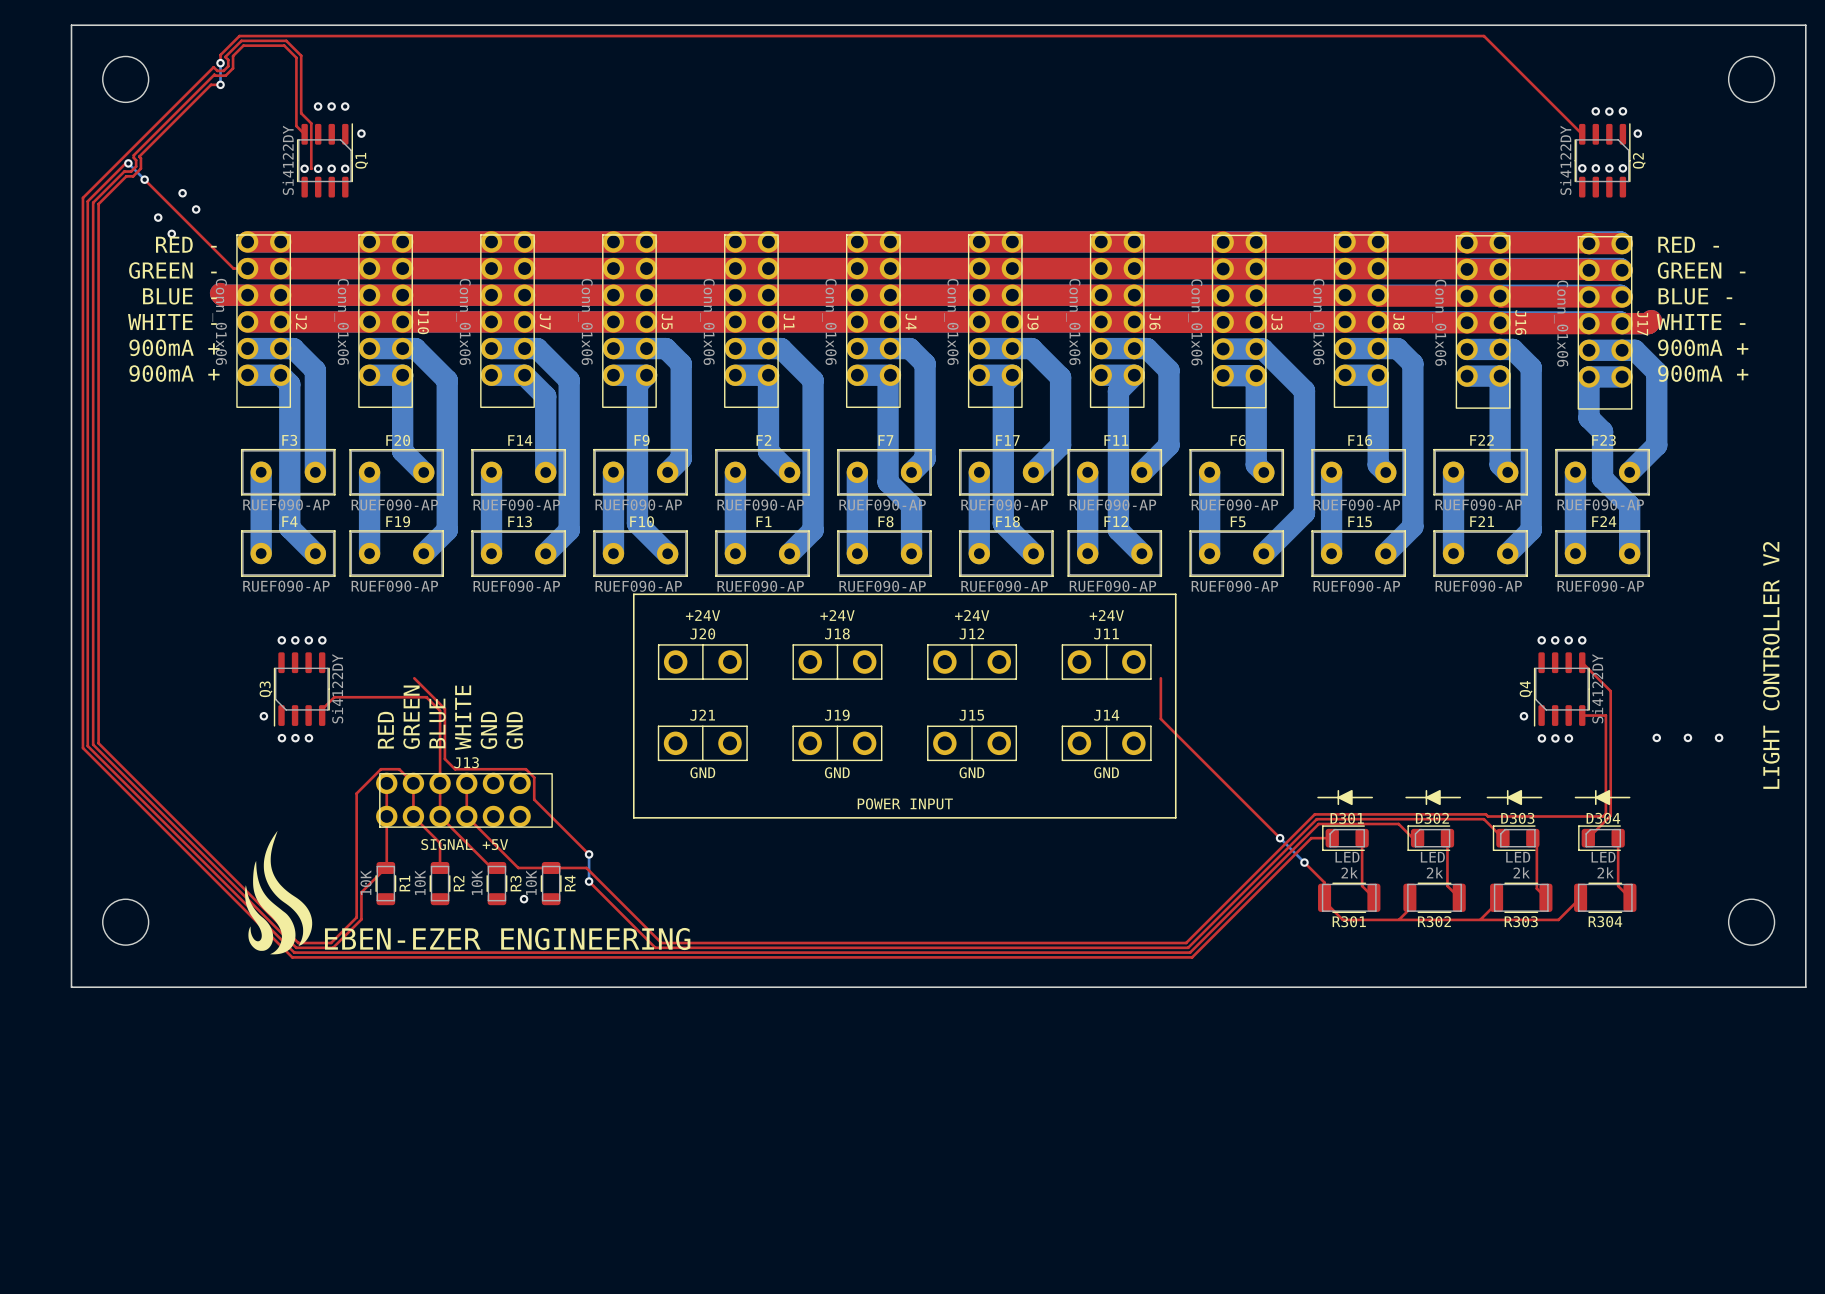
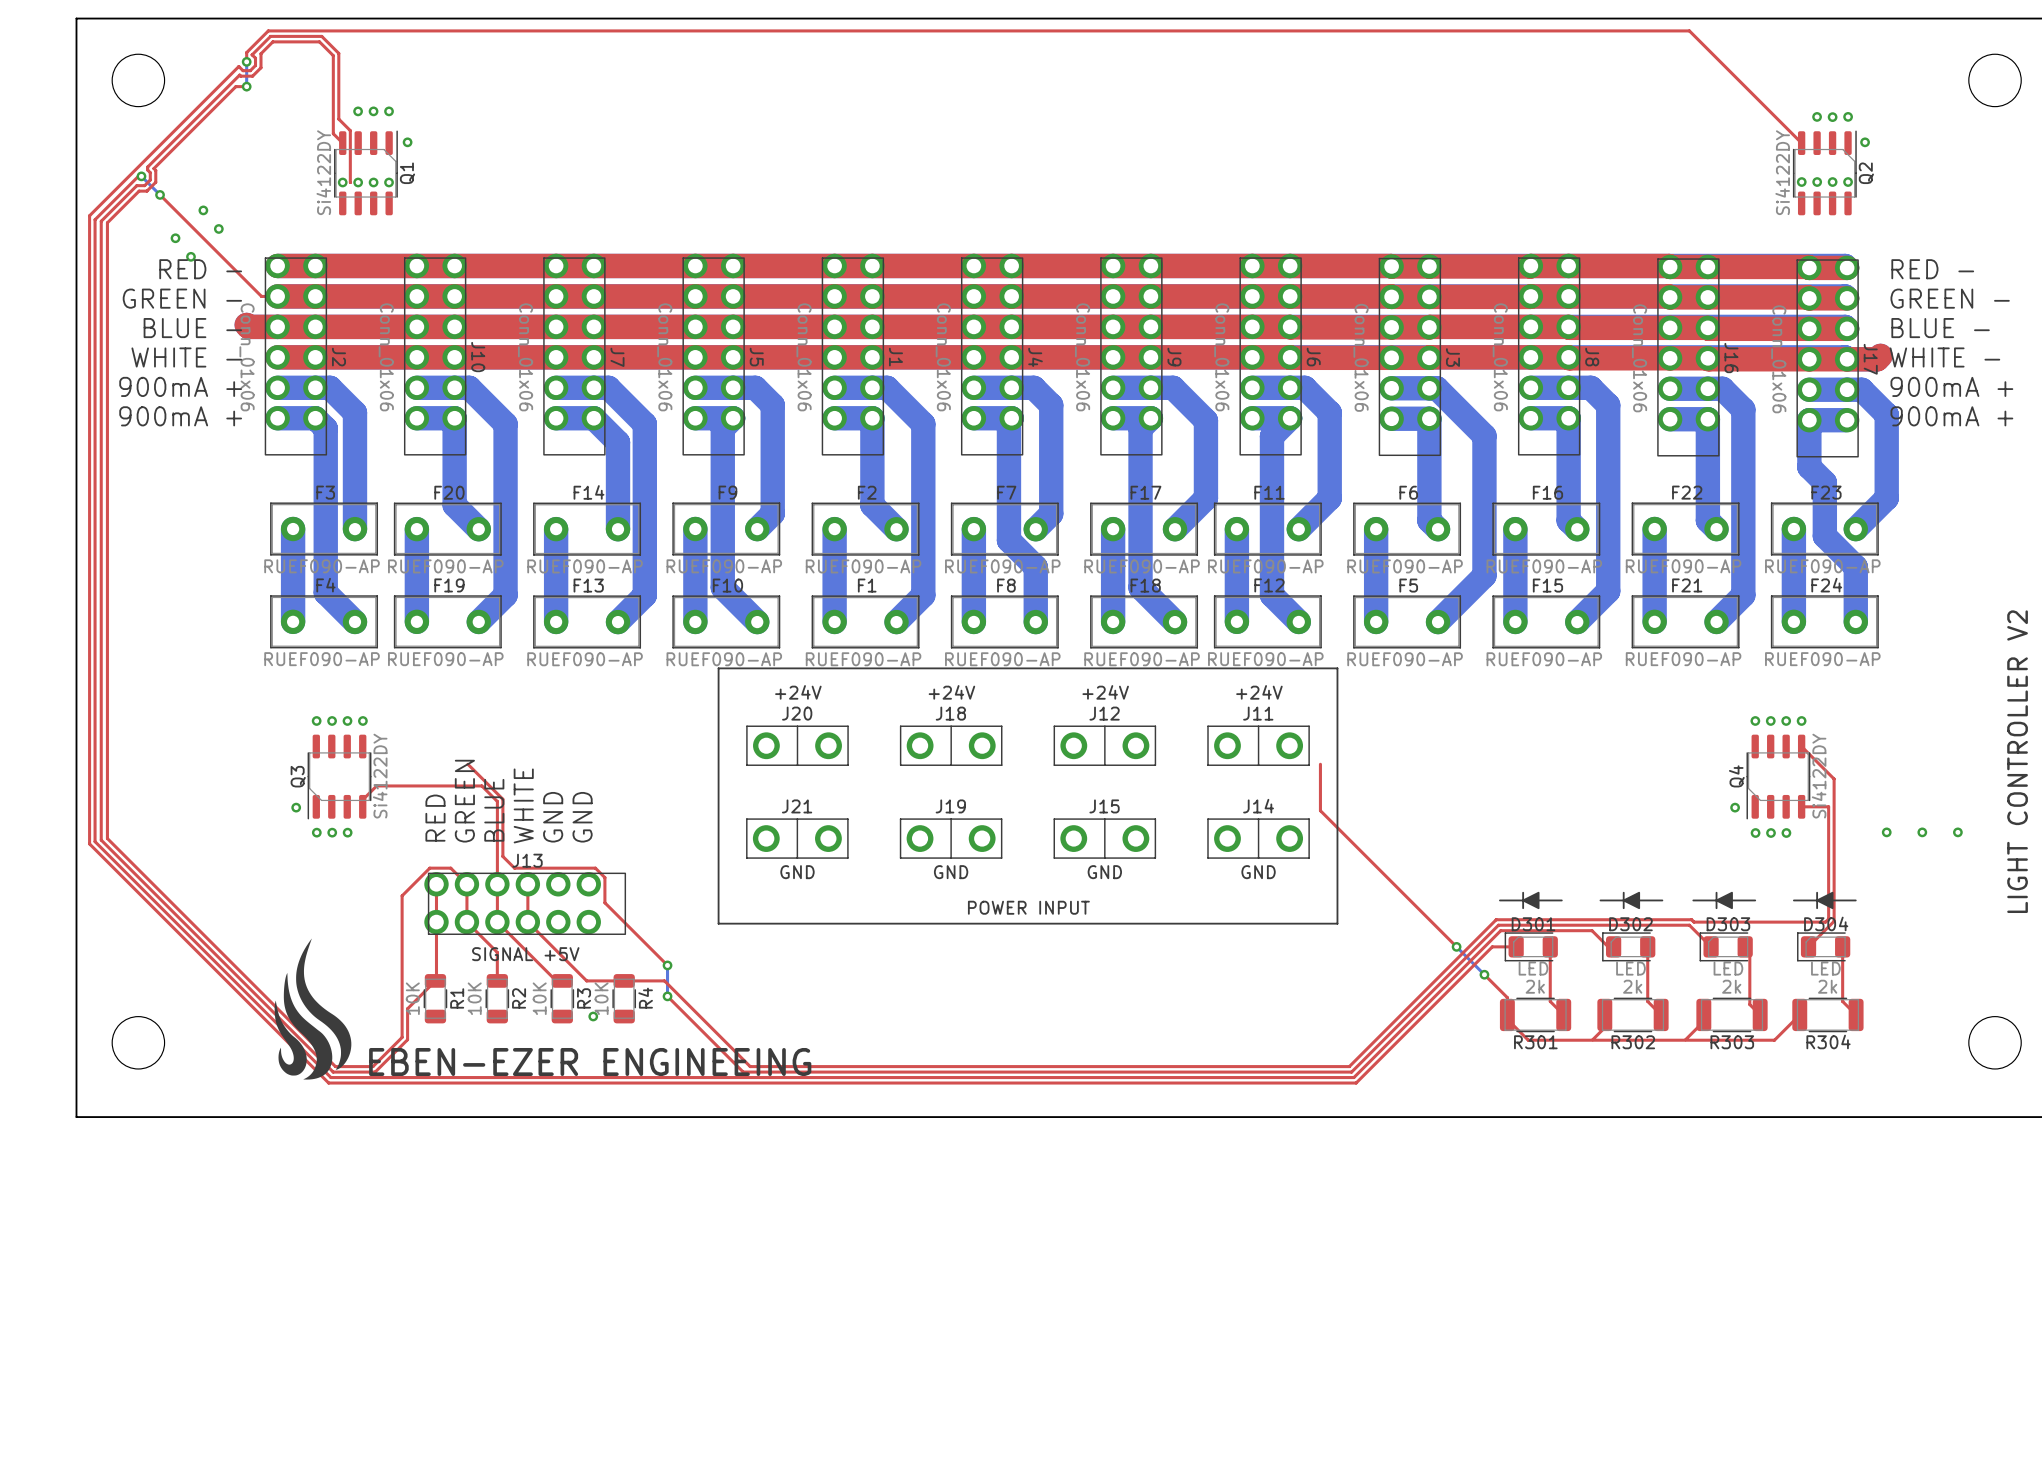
text: EBEN-EZER ENGINEERING (507, 939) -> EBEN-EZER ENGINEEING (590, 1062)

